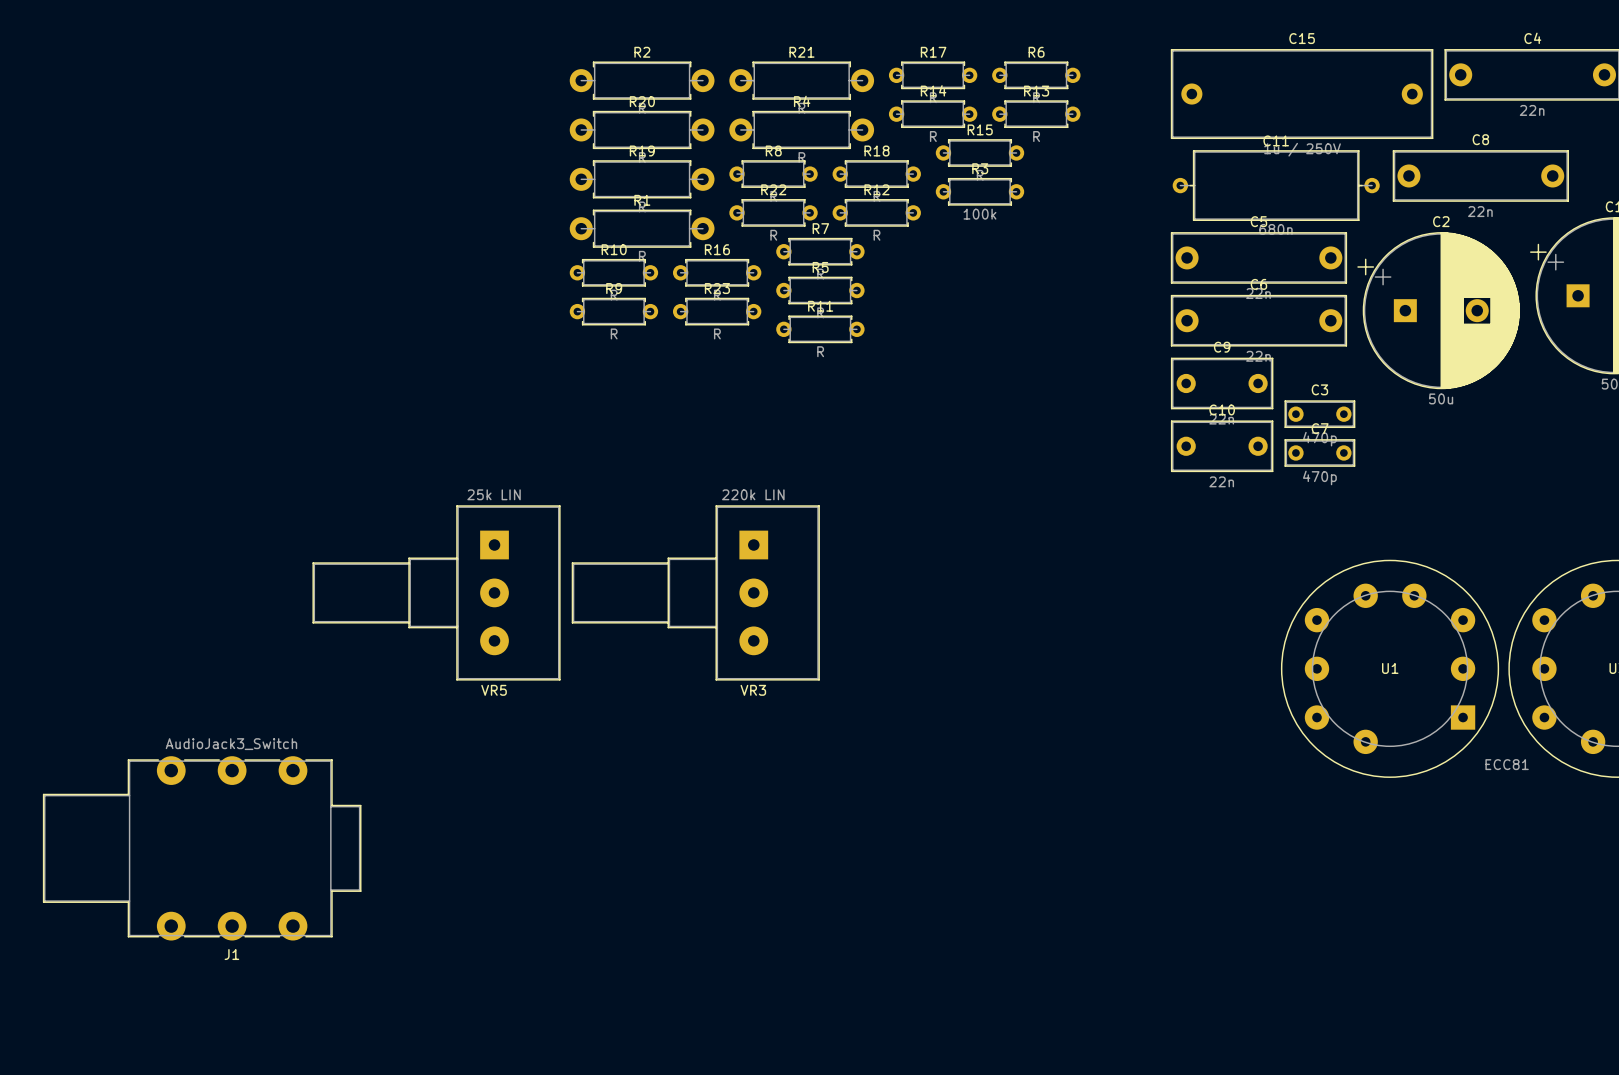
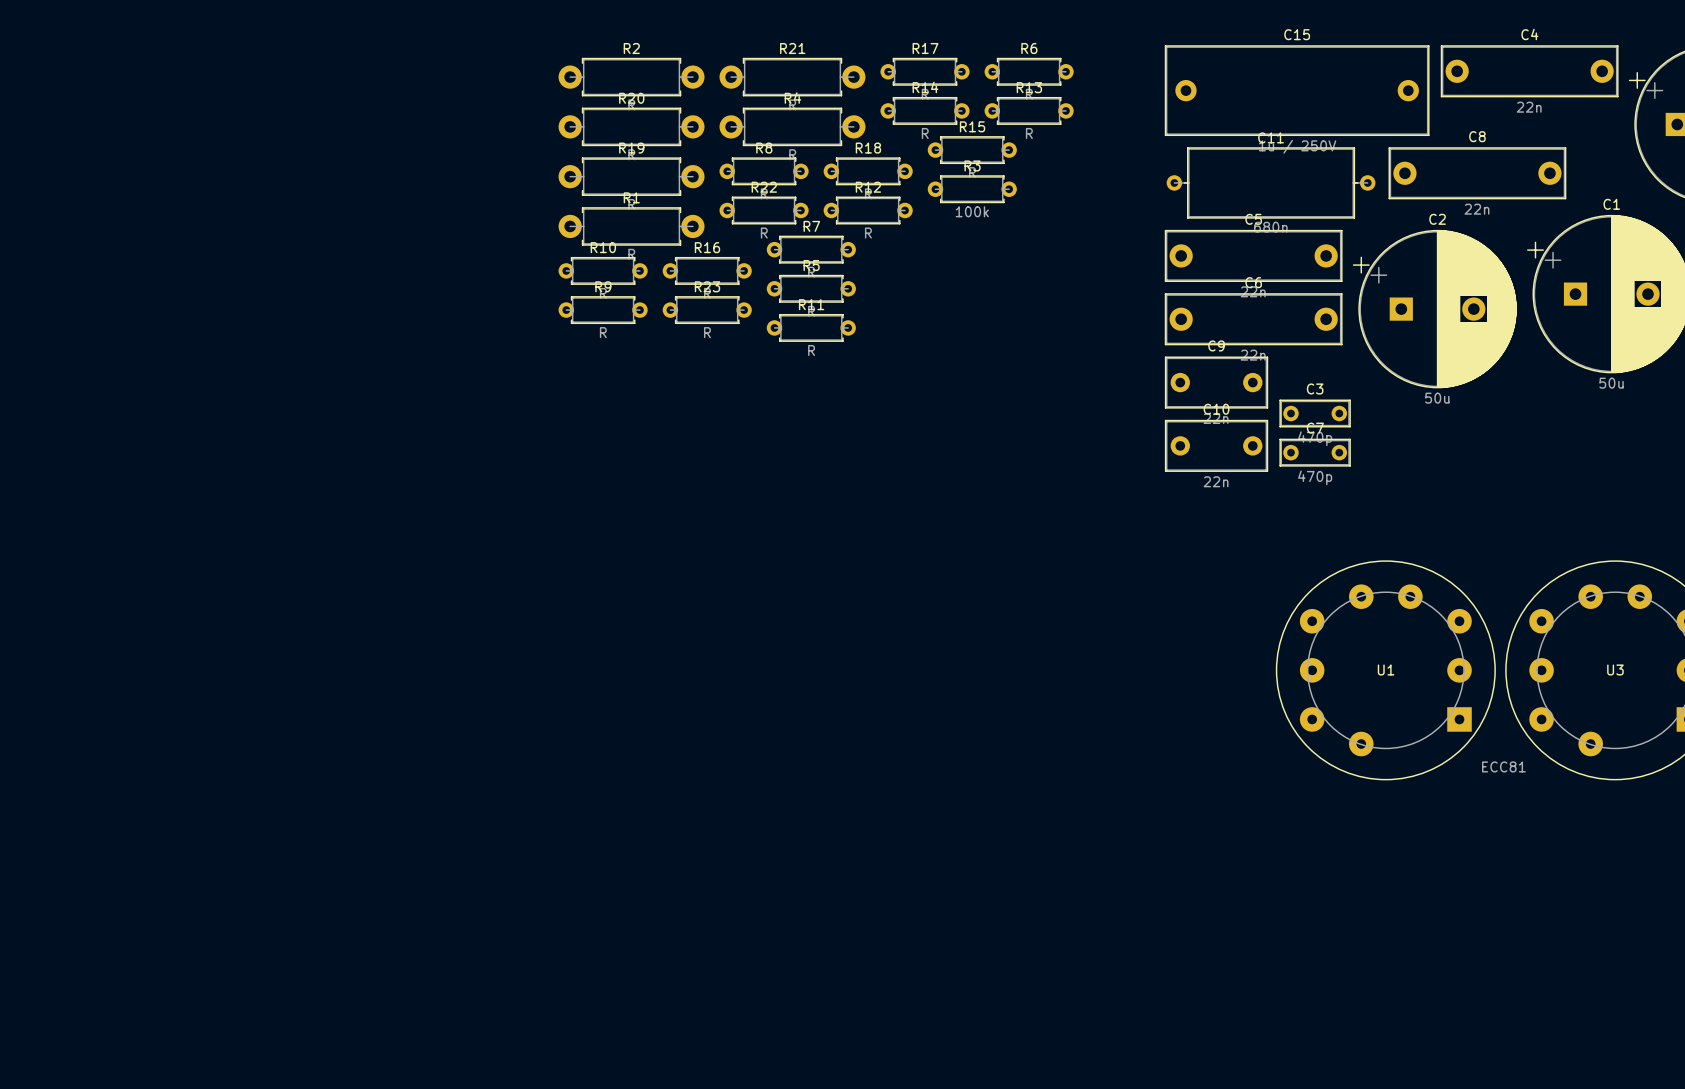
VR5: 25k LIN (436, 592) -> none
VR3: 220k LIN (695, 592) -> none
J1: AudioJack3_Switch (202, 848) -> none

